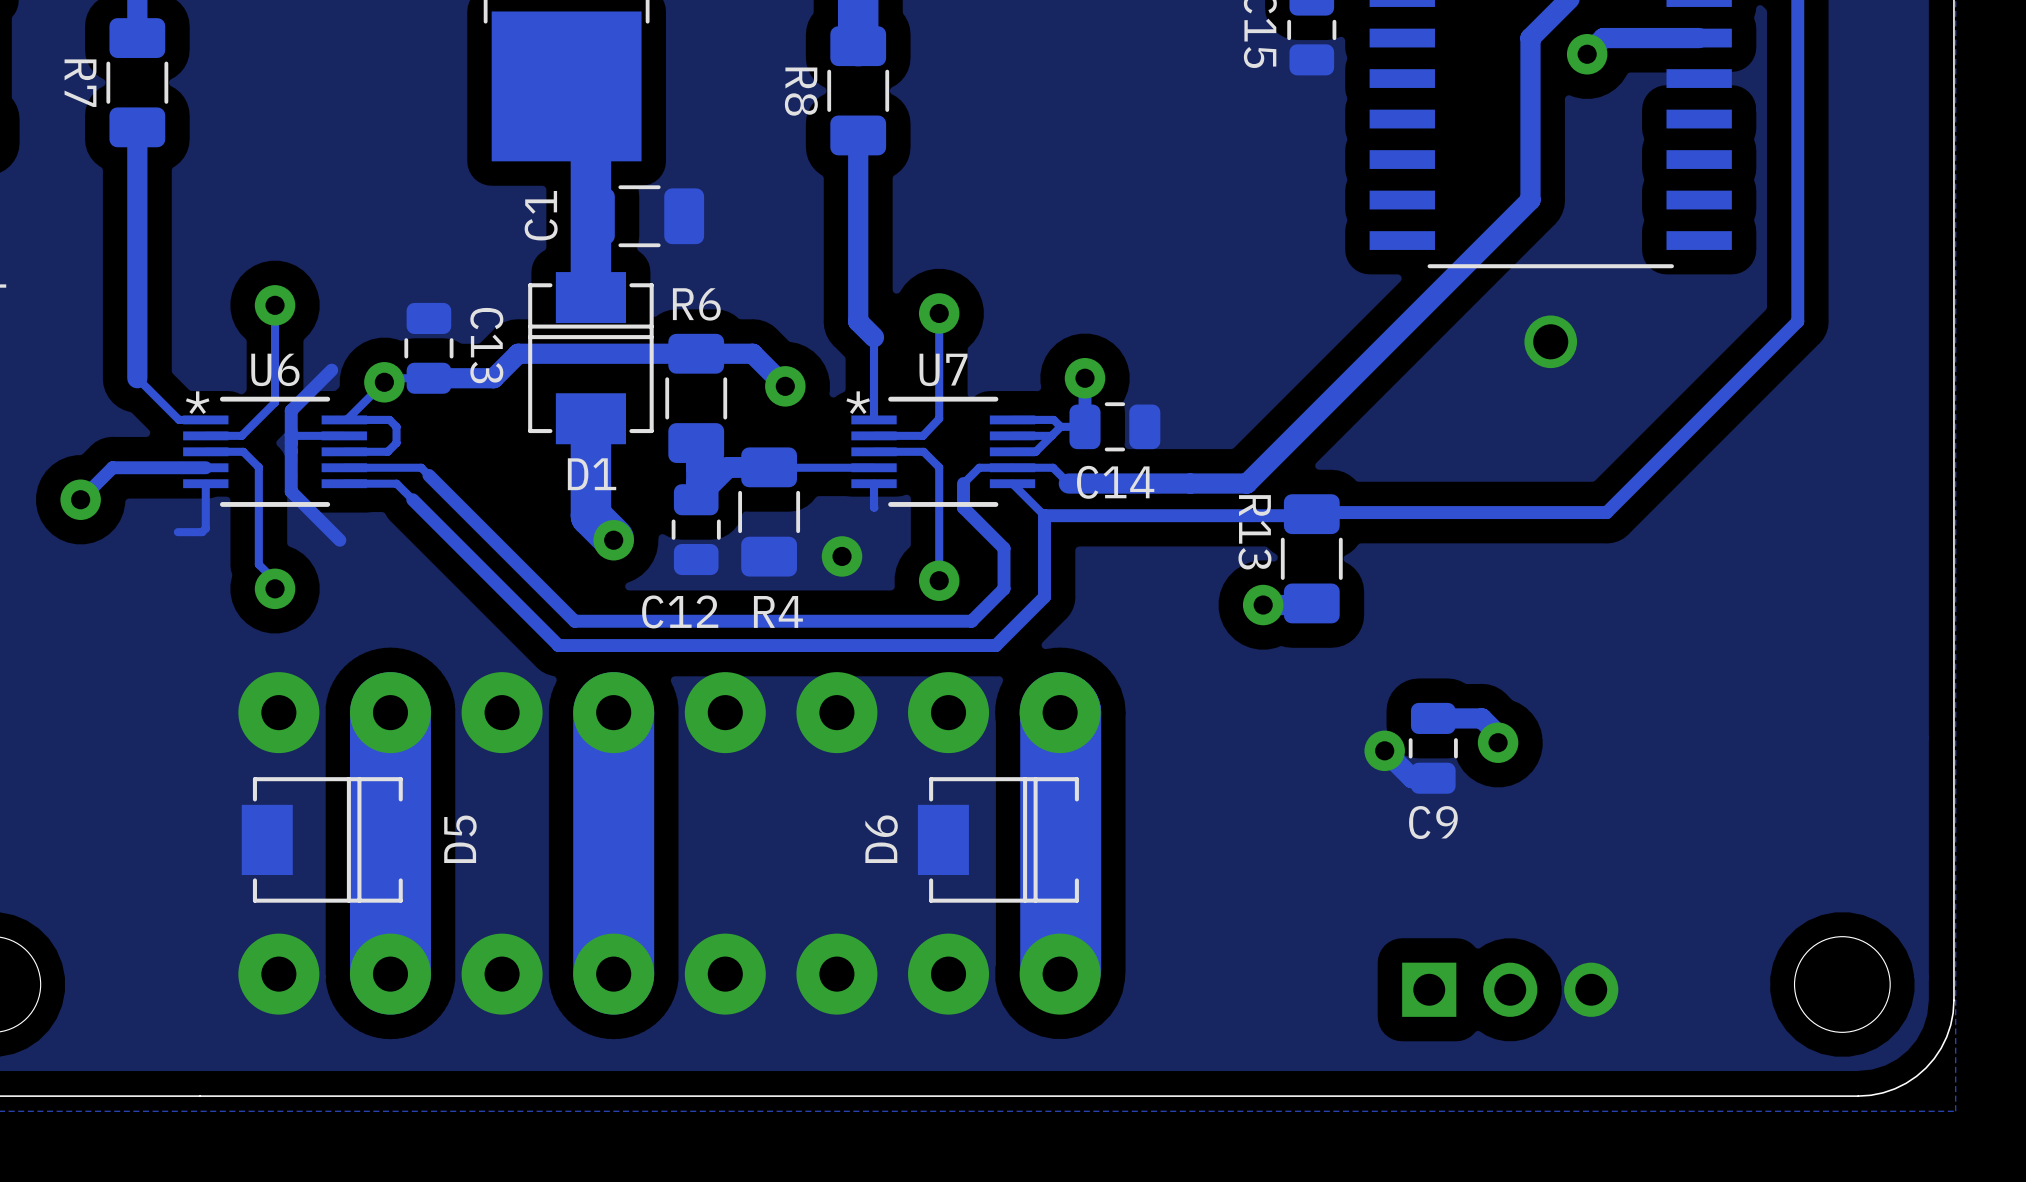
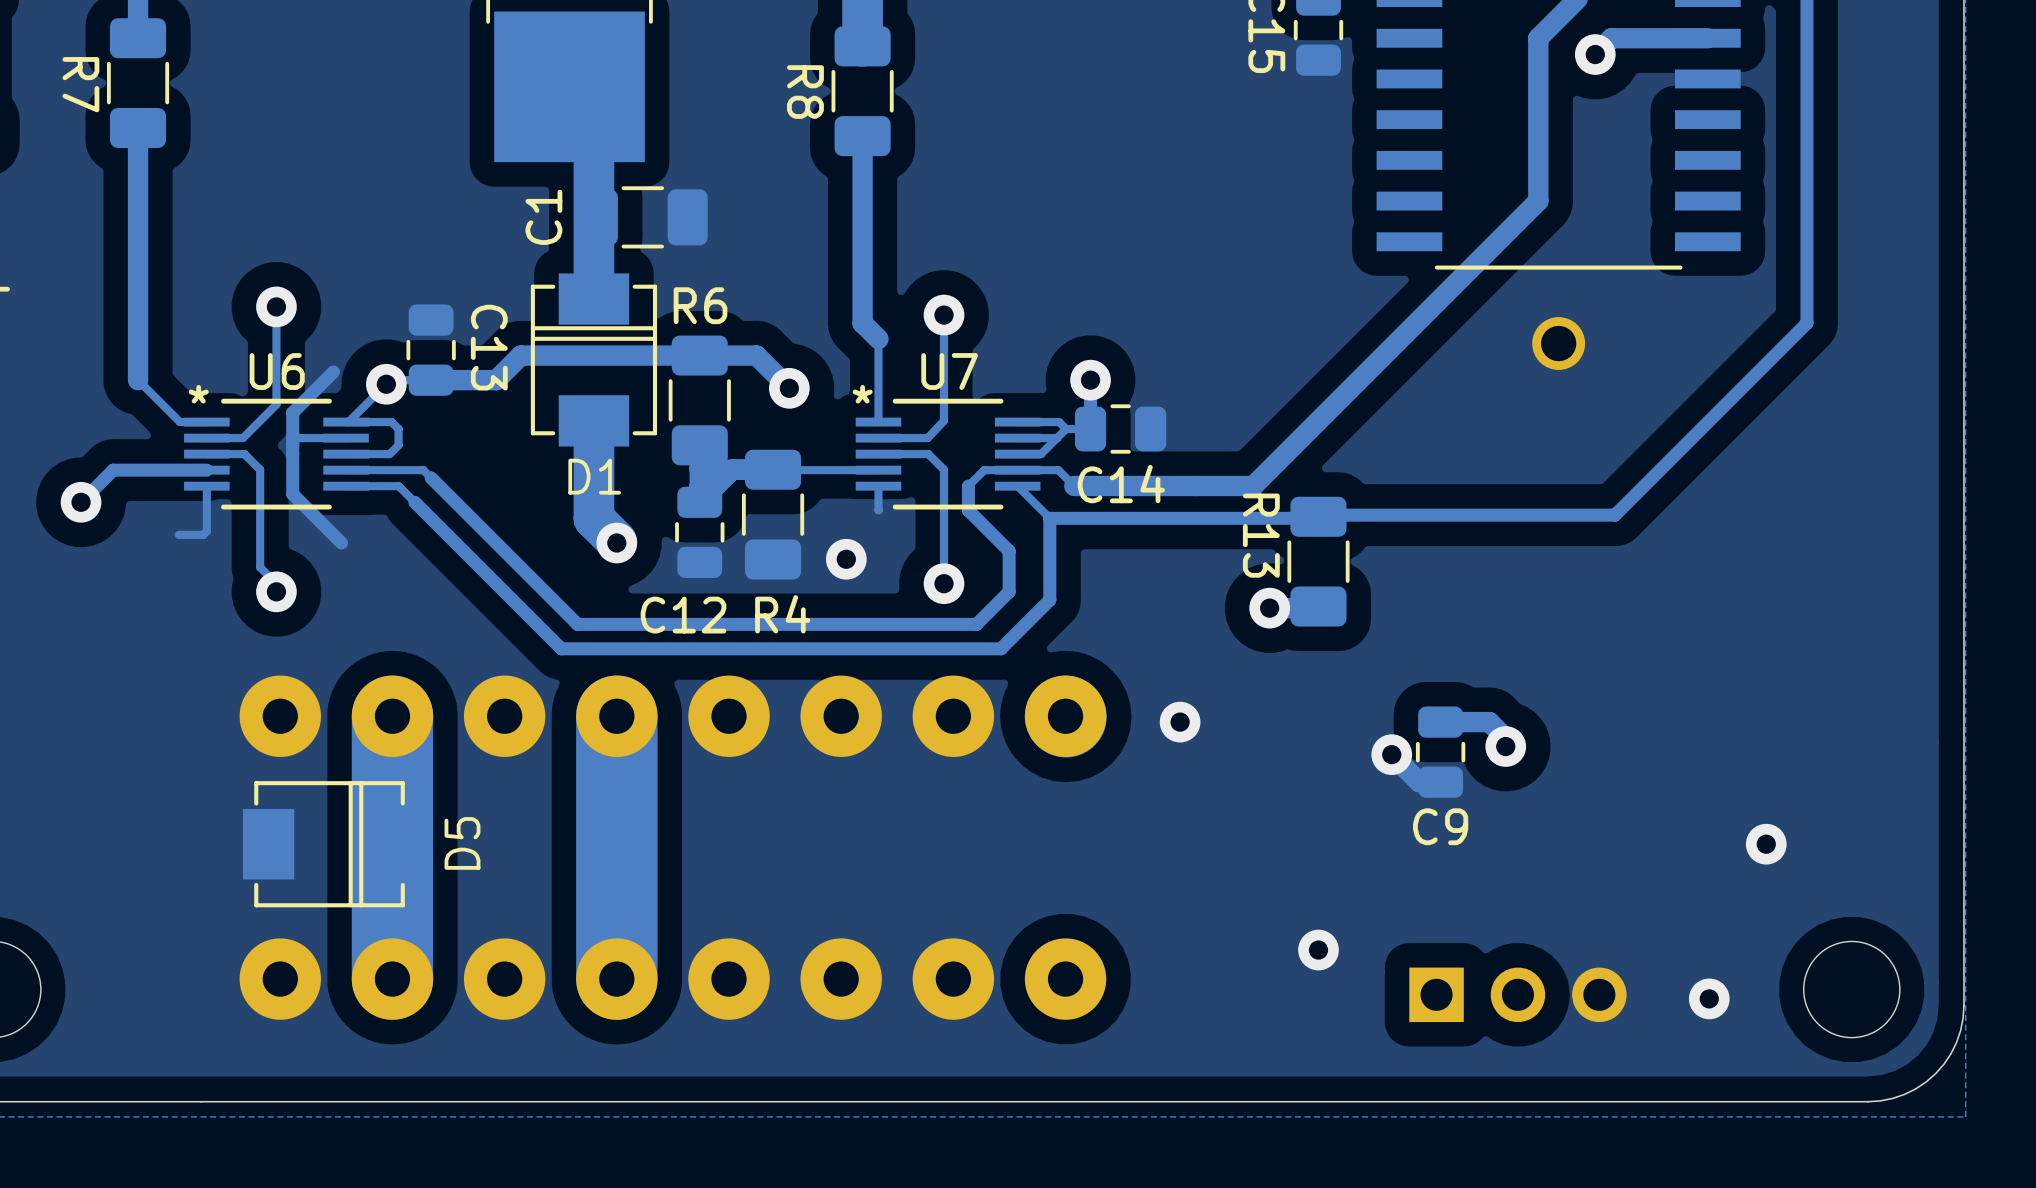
track: (1060, 713) (1060, 969) -> none
via: none -> (1180, 722)
D6: (1004, 839) -> none
via: none -> (1766, 844)
via: none -> (1318, 950)
via: none -> (1709, 998)

